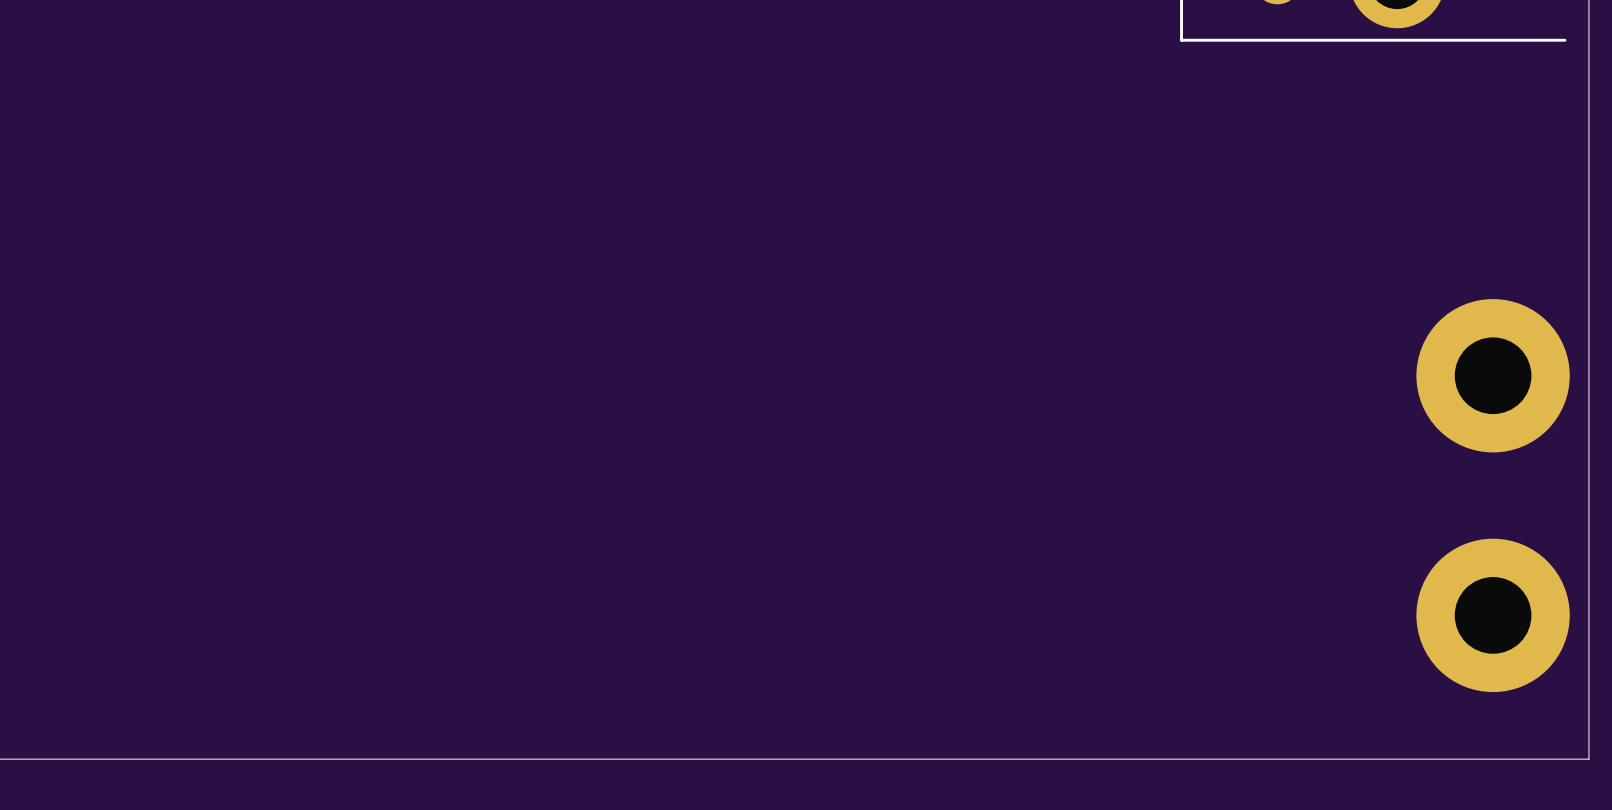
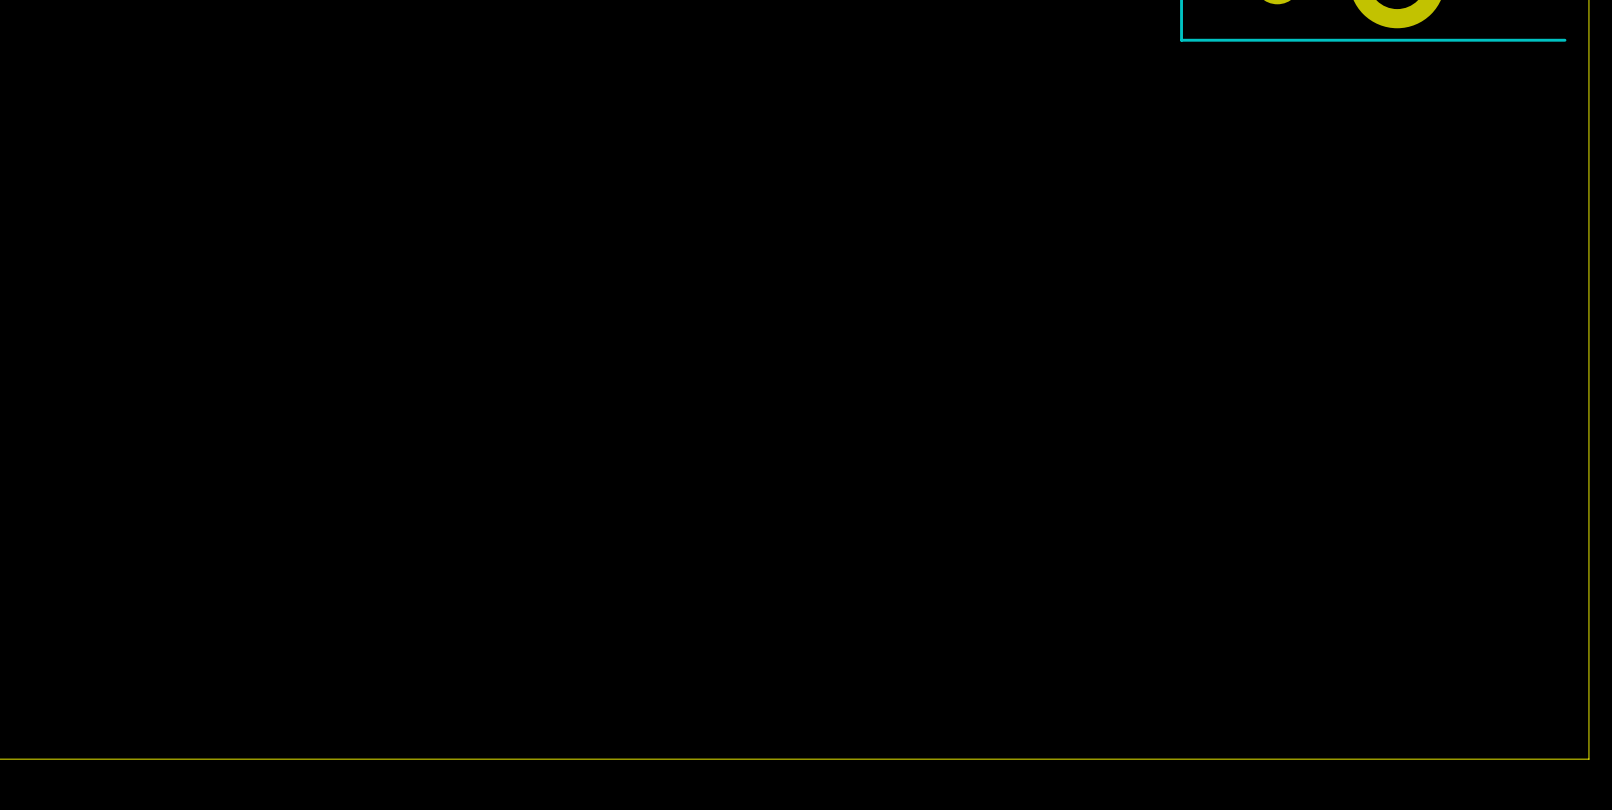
part: (1493, 375) -> none
part: (1493, 615) -> none

